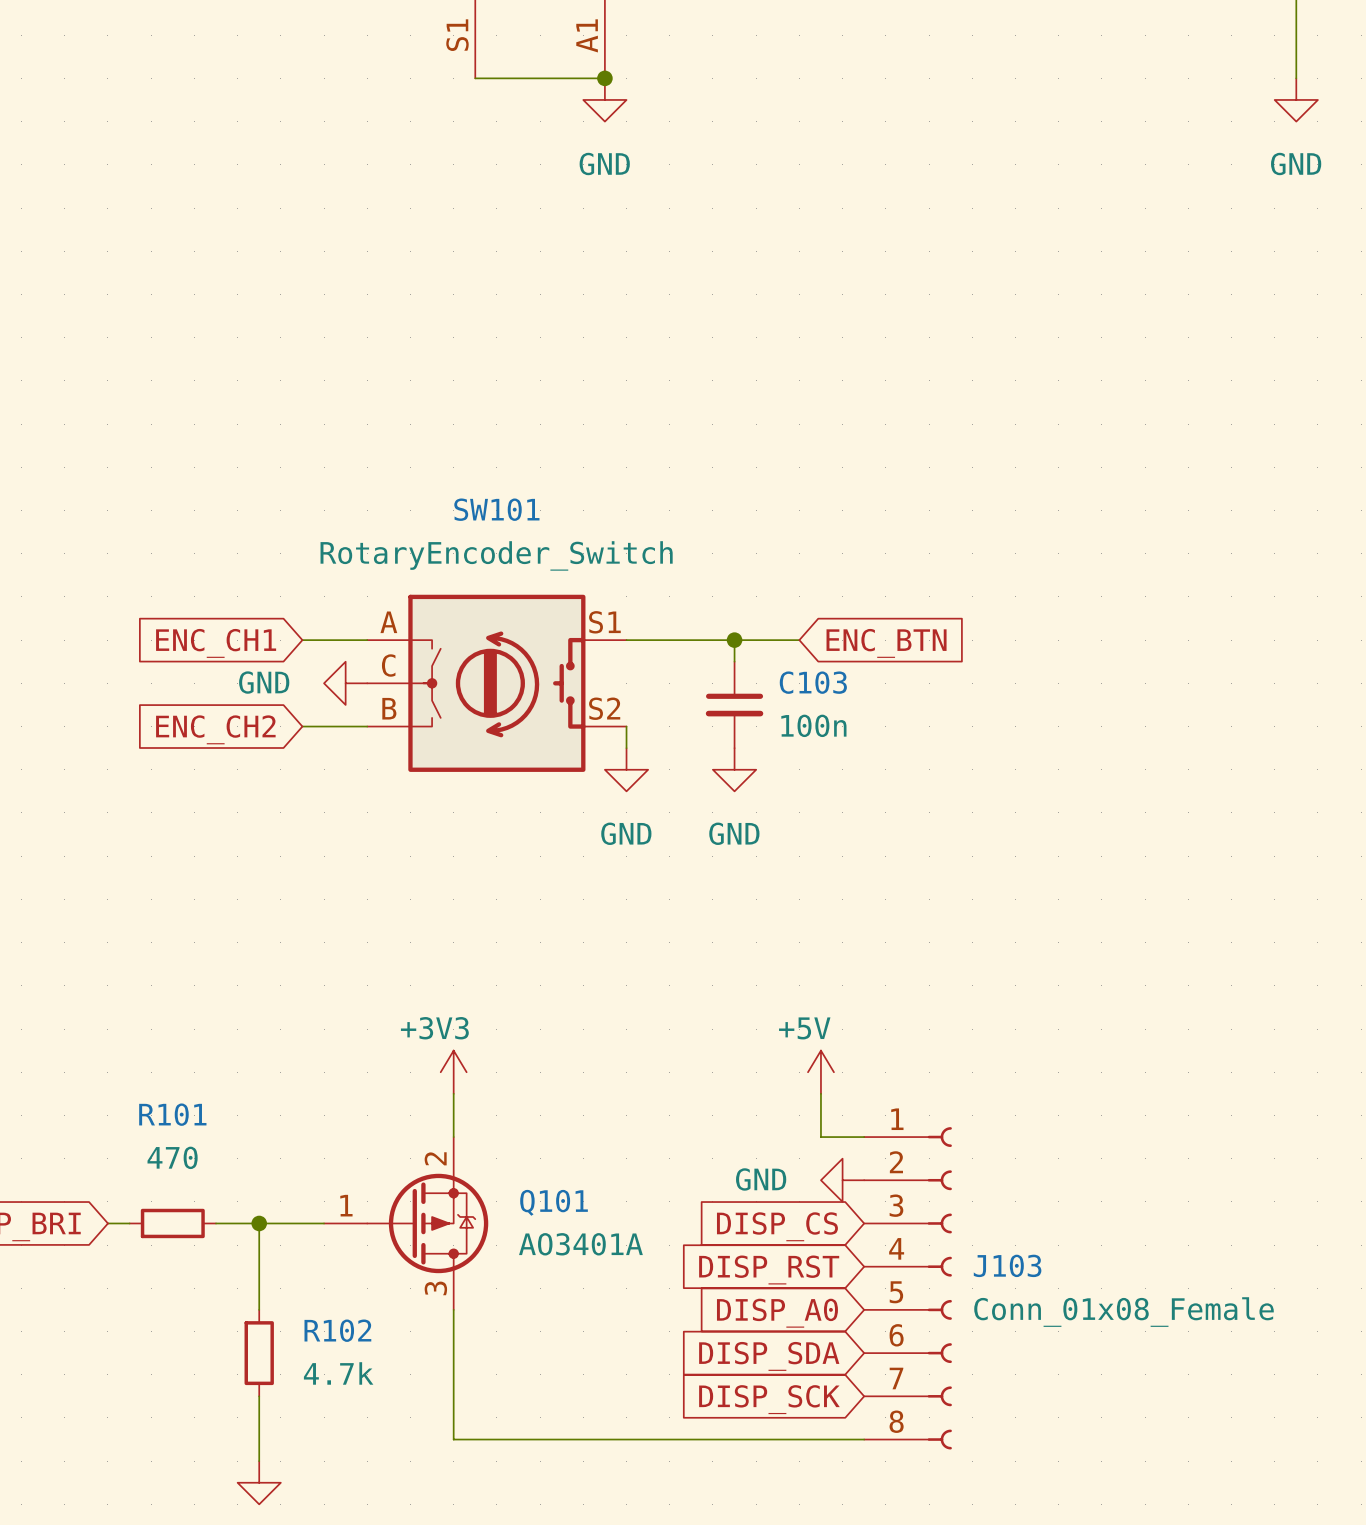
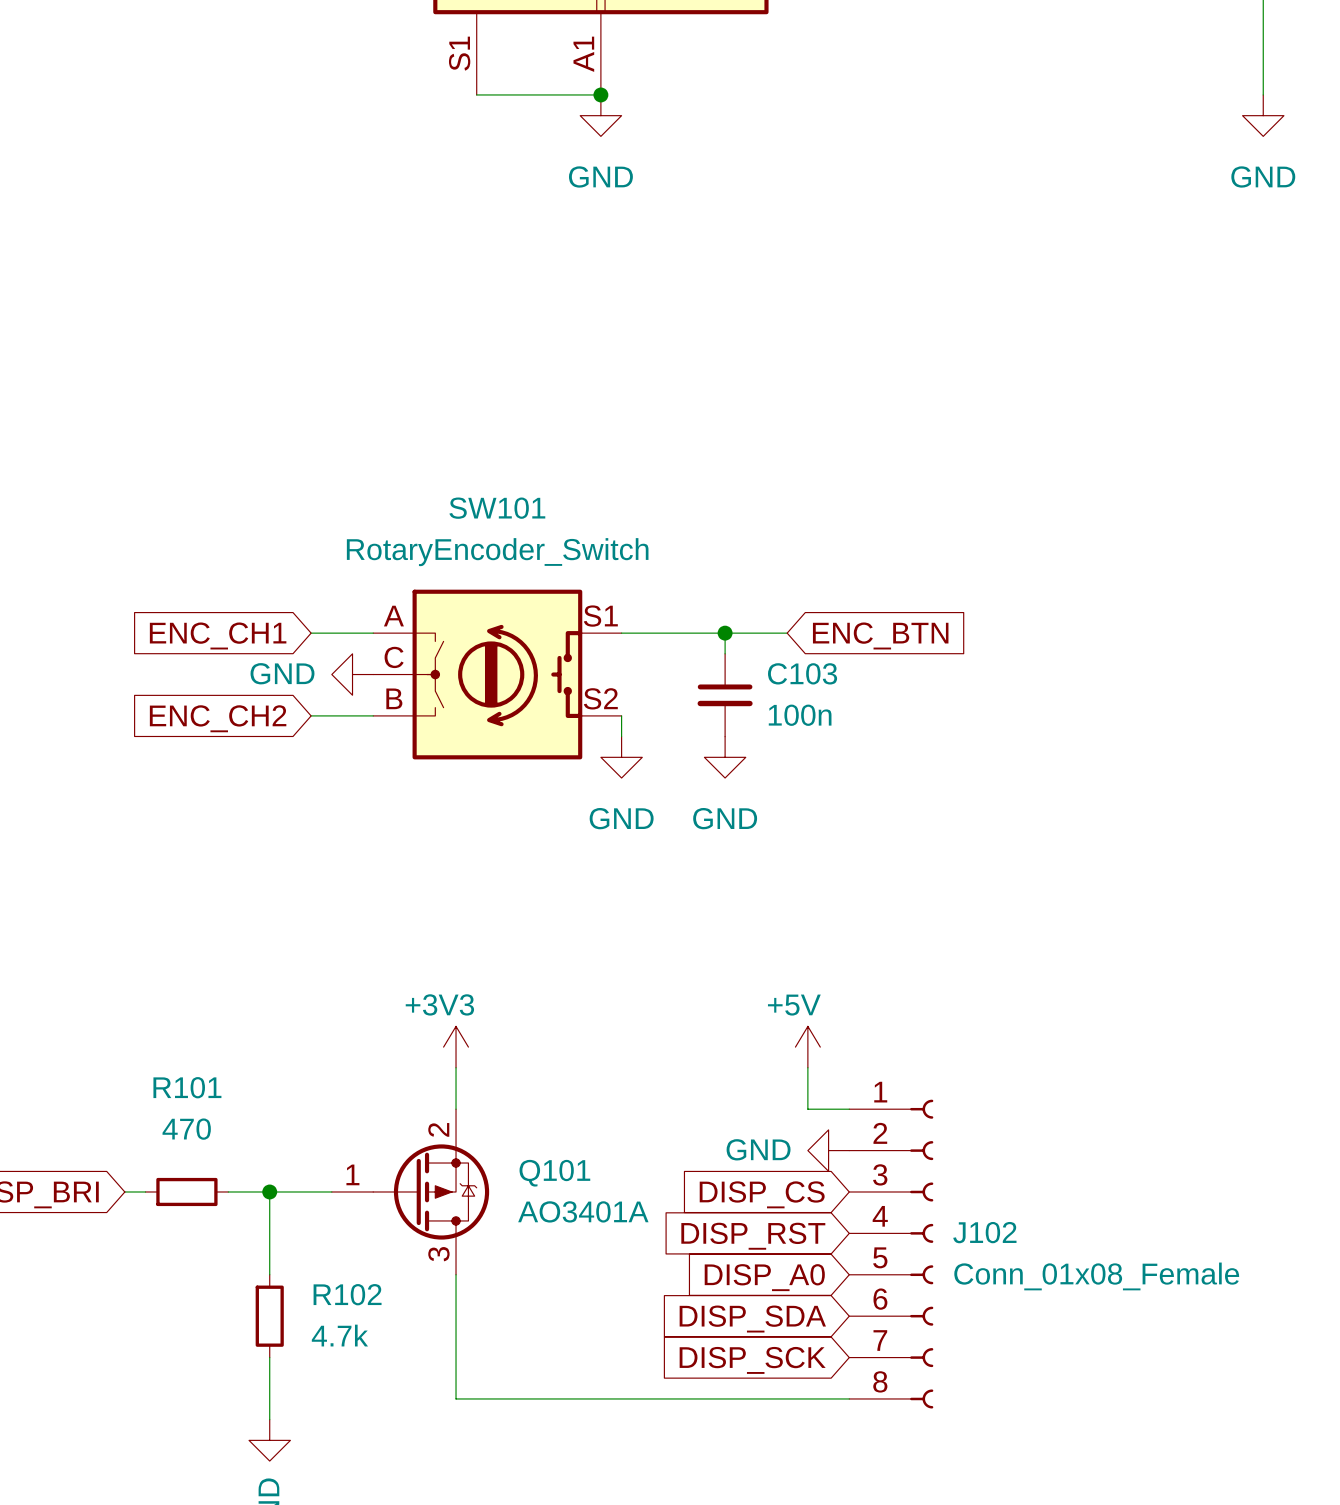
J103 name: J103 (1007, 1265) -> J102 (984, 1232)

